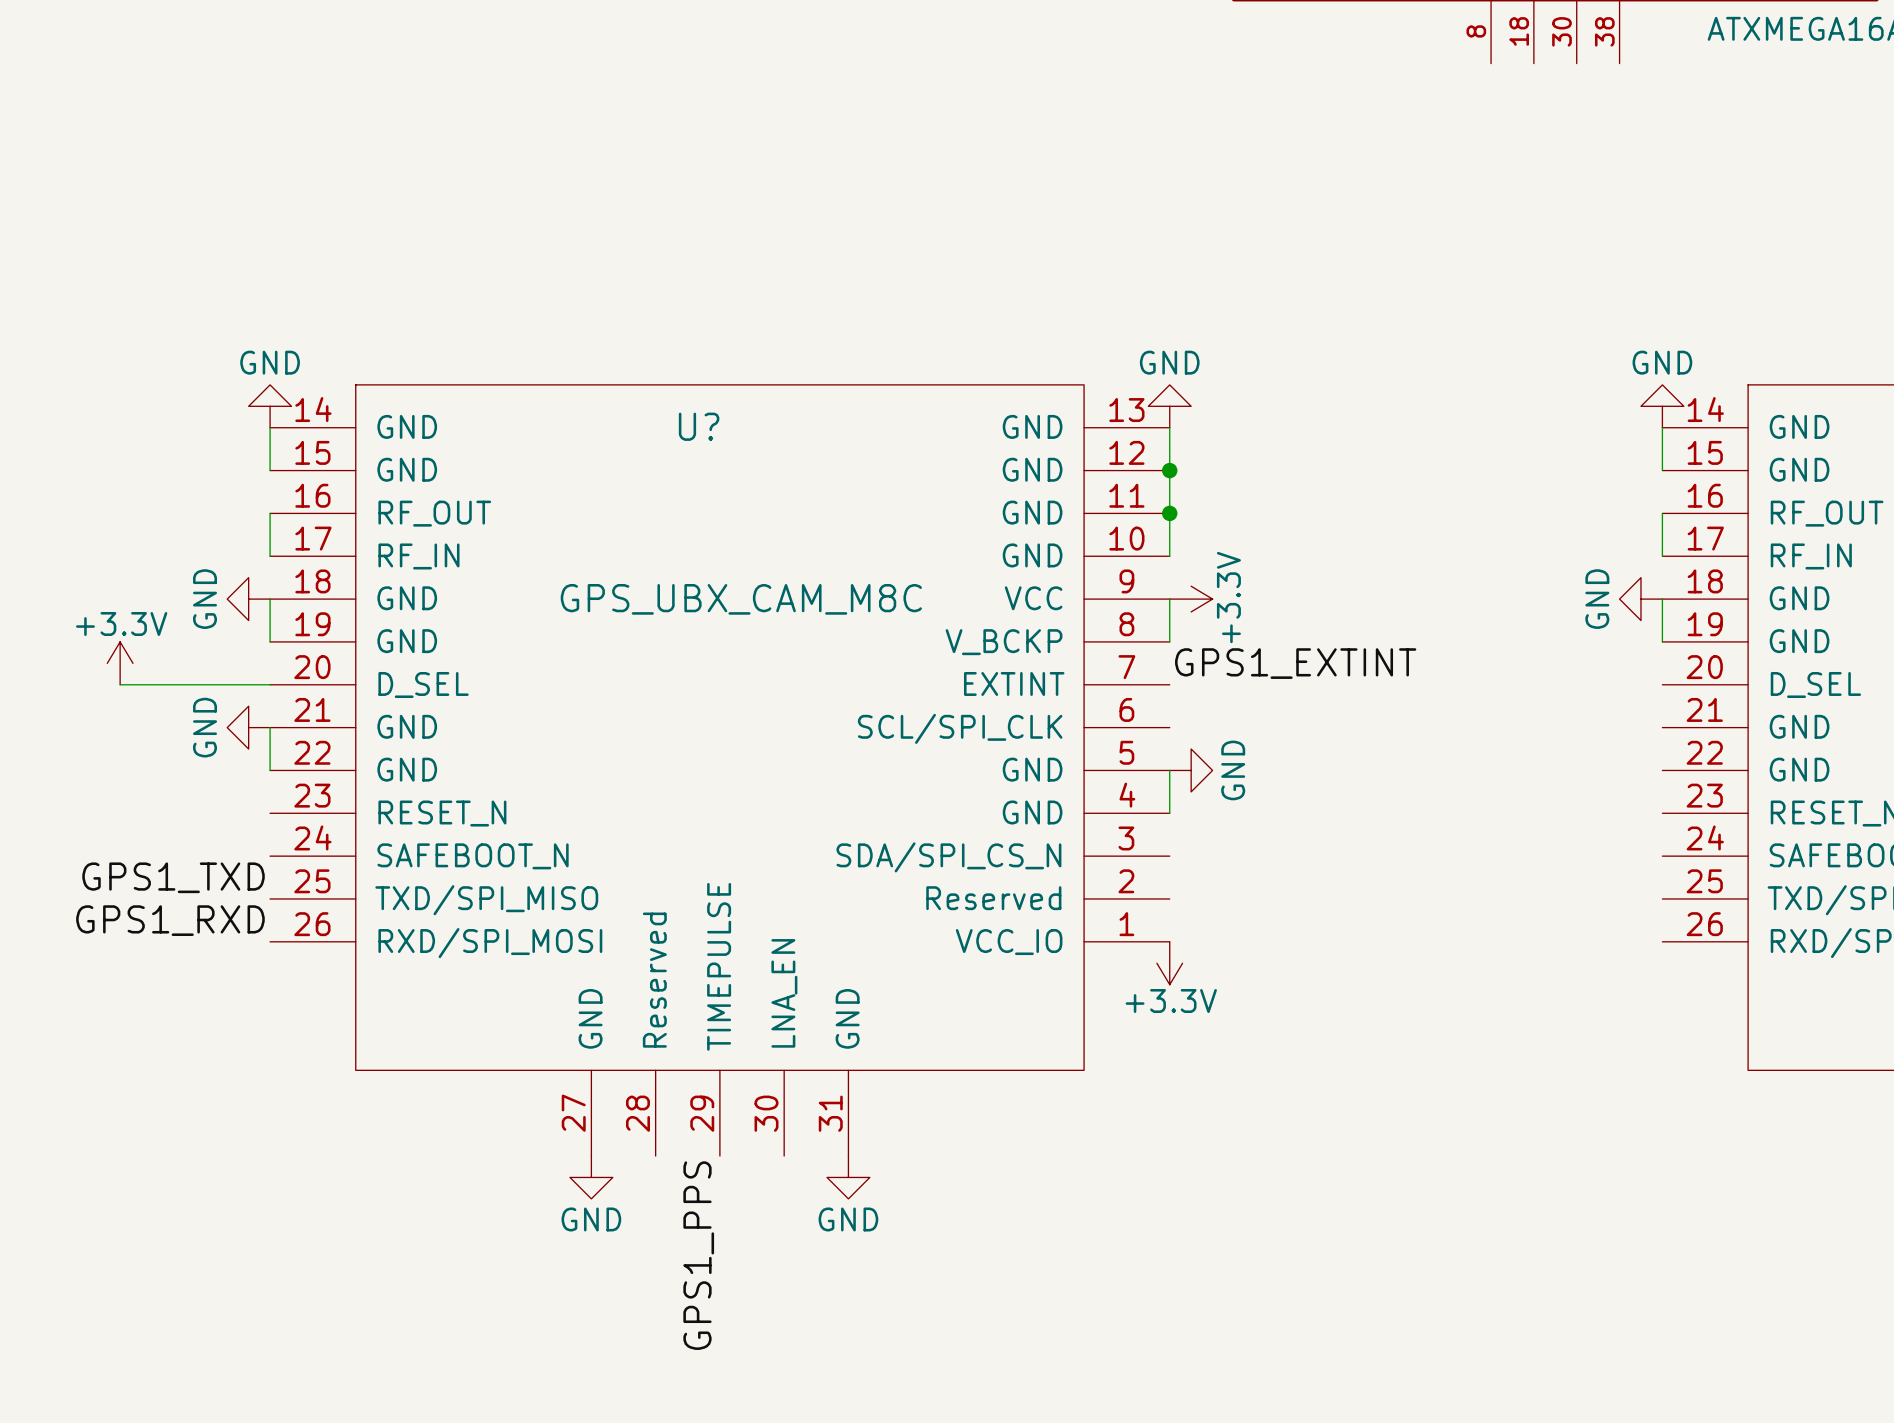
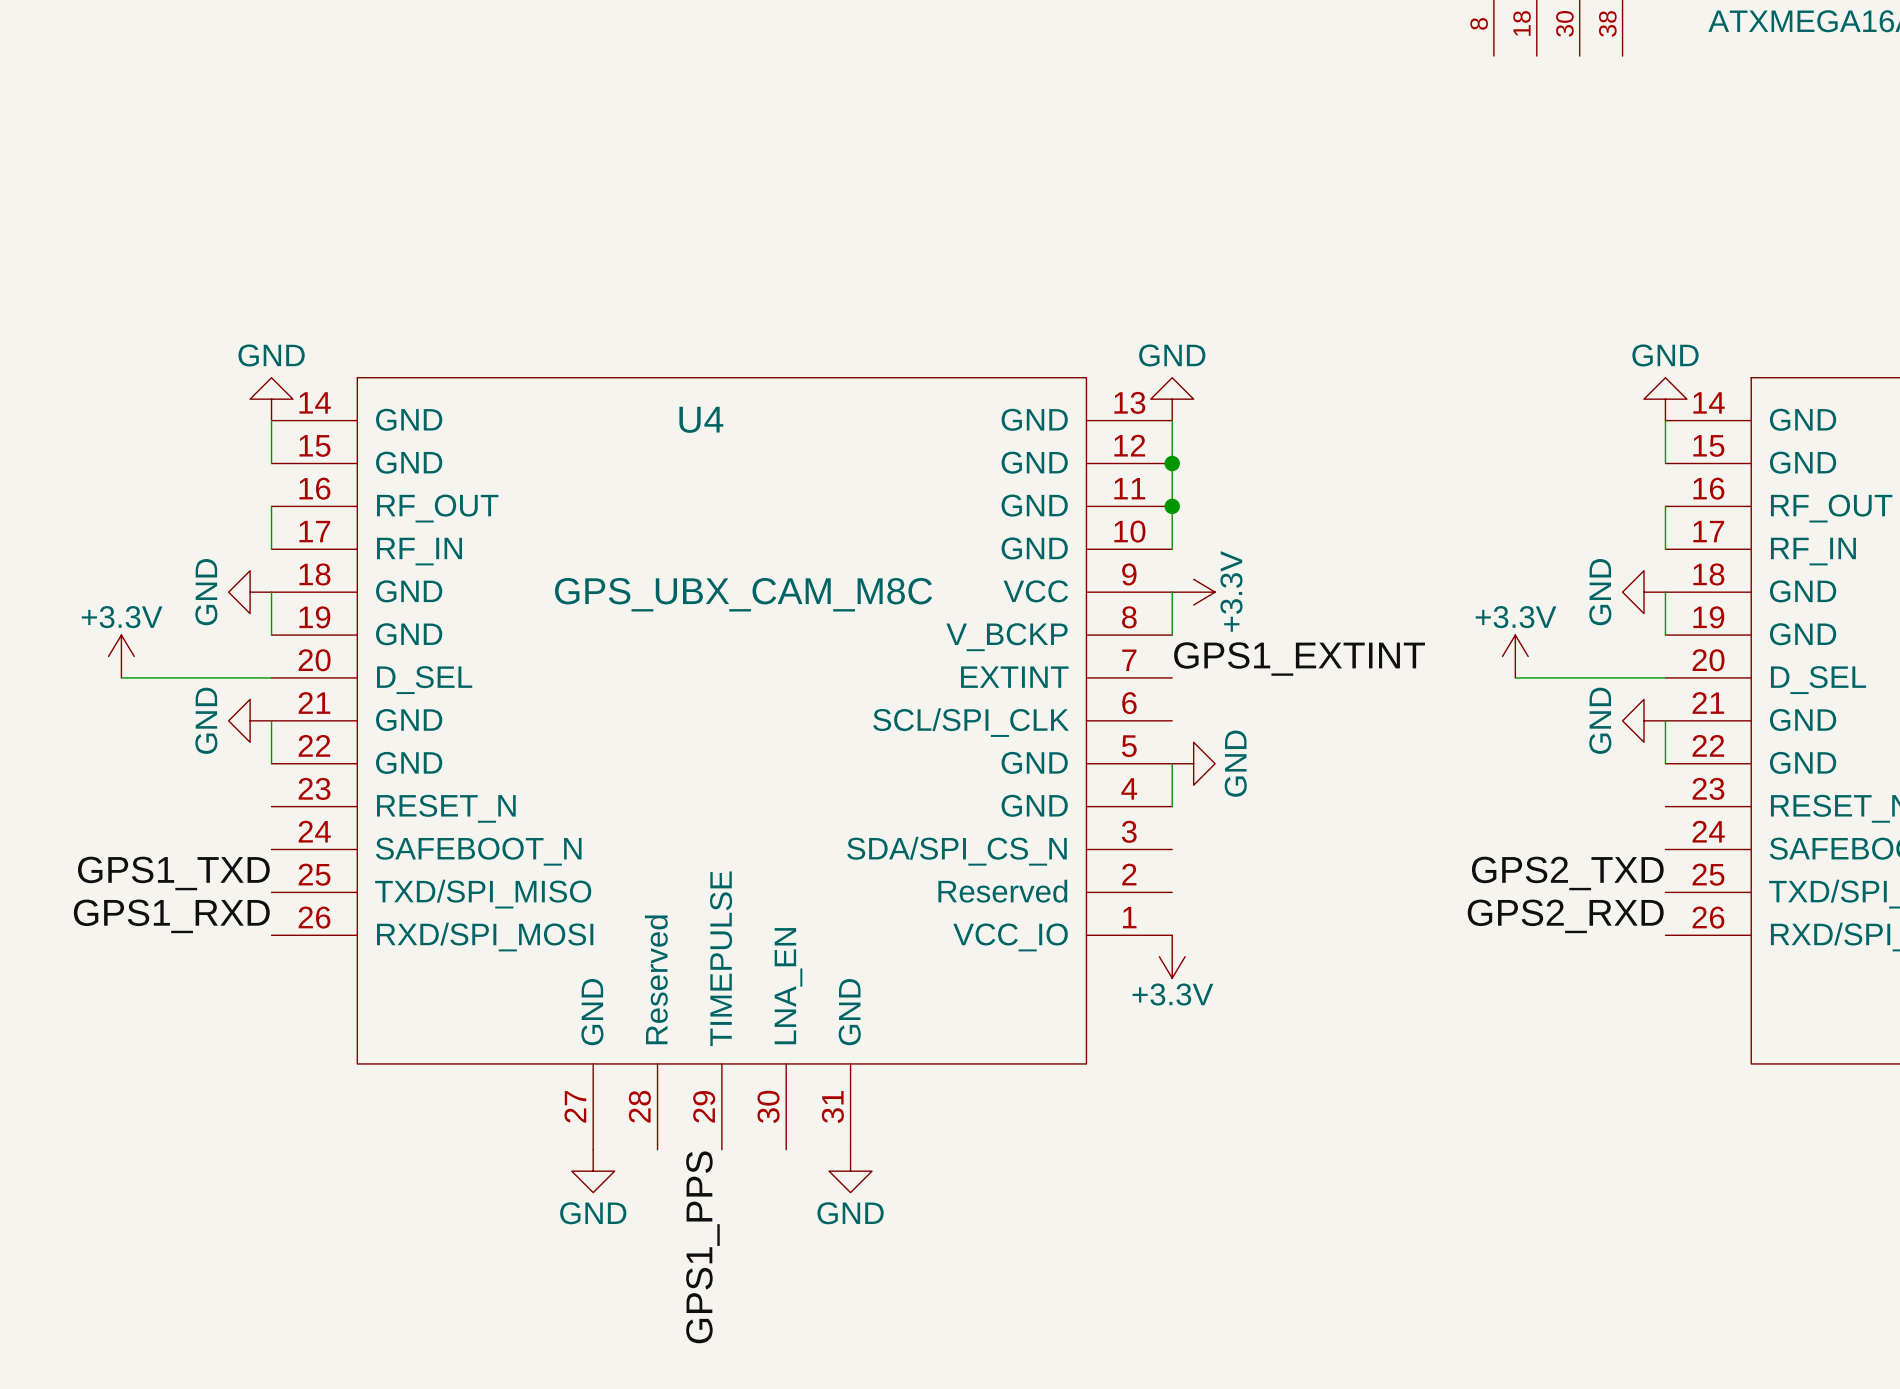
U? name: U? (699, 426) -> U4 (701, 419)
power symbol: none -> +3.3V (1515, 656)
wire: none -> (1515, 677) (1665, 677)
power symbol: none -> GND (1644, 720)
wire: none -> (1665, 720) (1665, 763)
label: none -> GPS2_TXD (1567, 873)
label: none -> GPS2_RXD (1565, 916)

